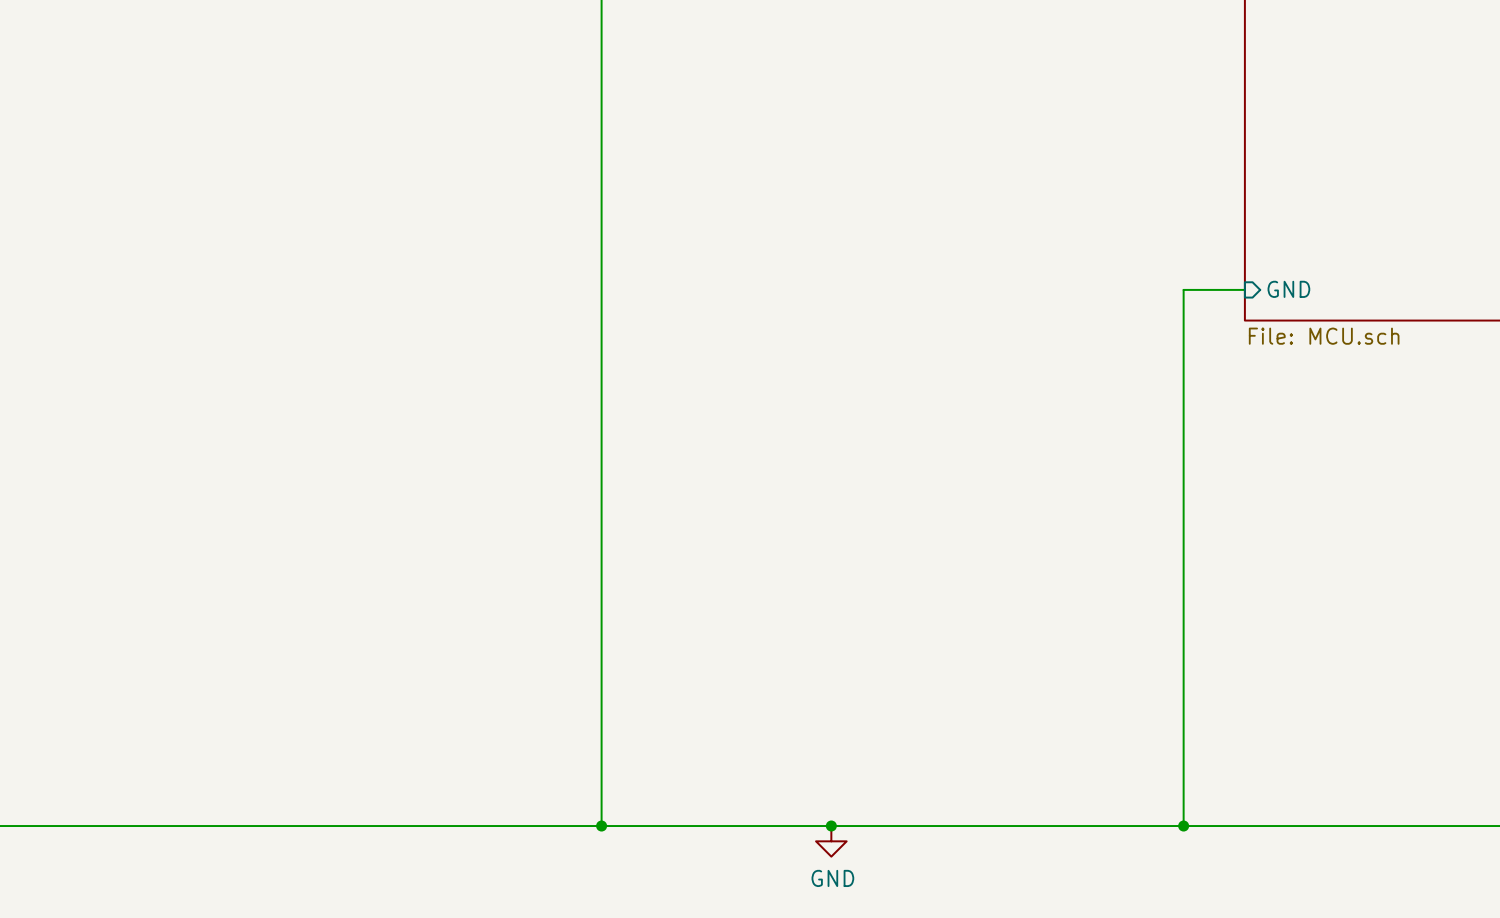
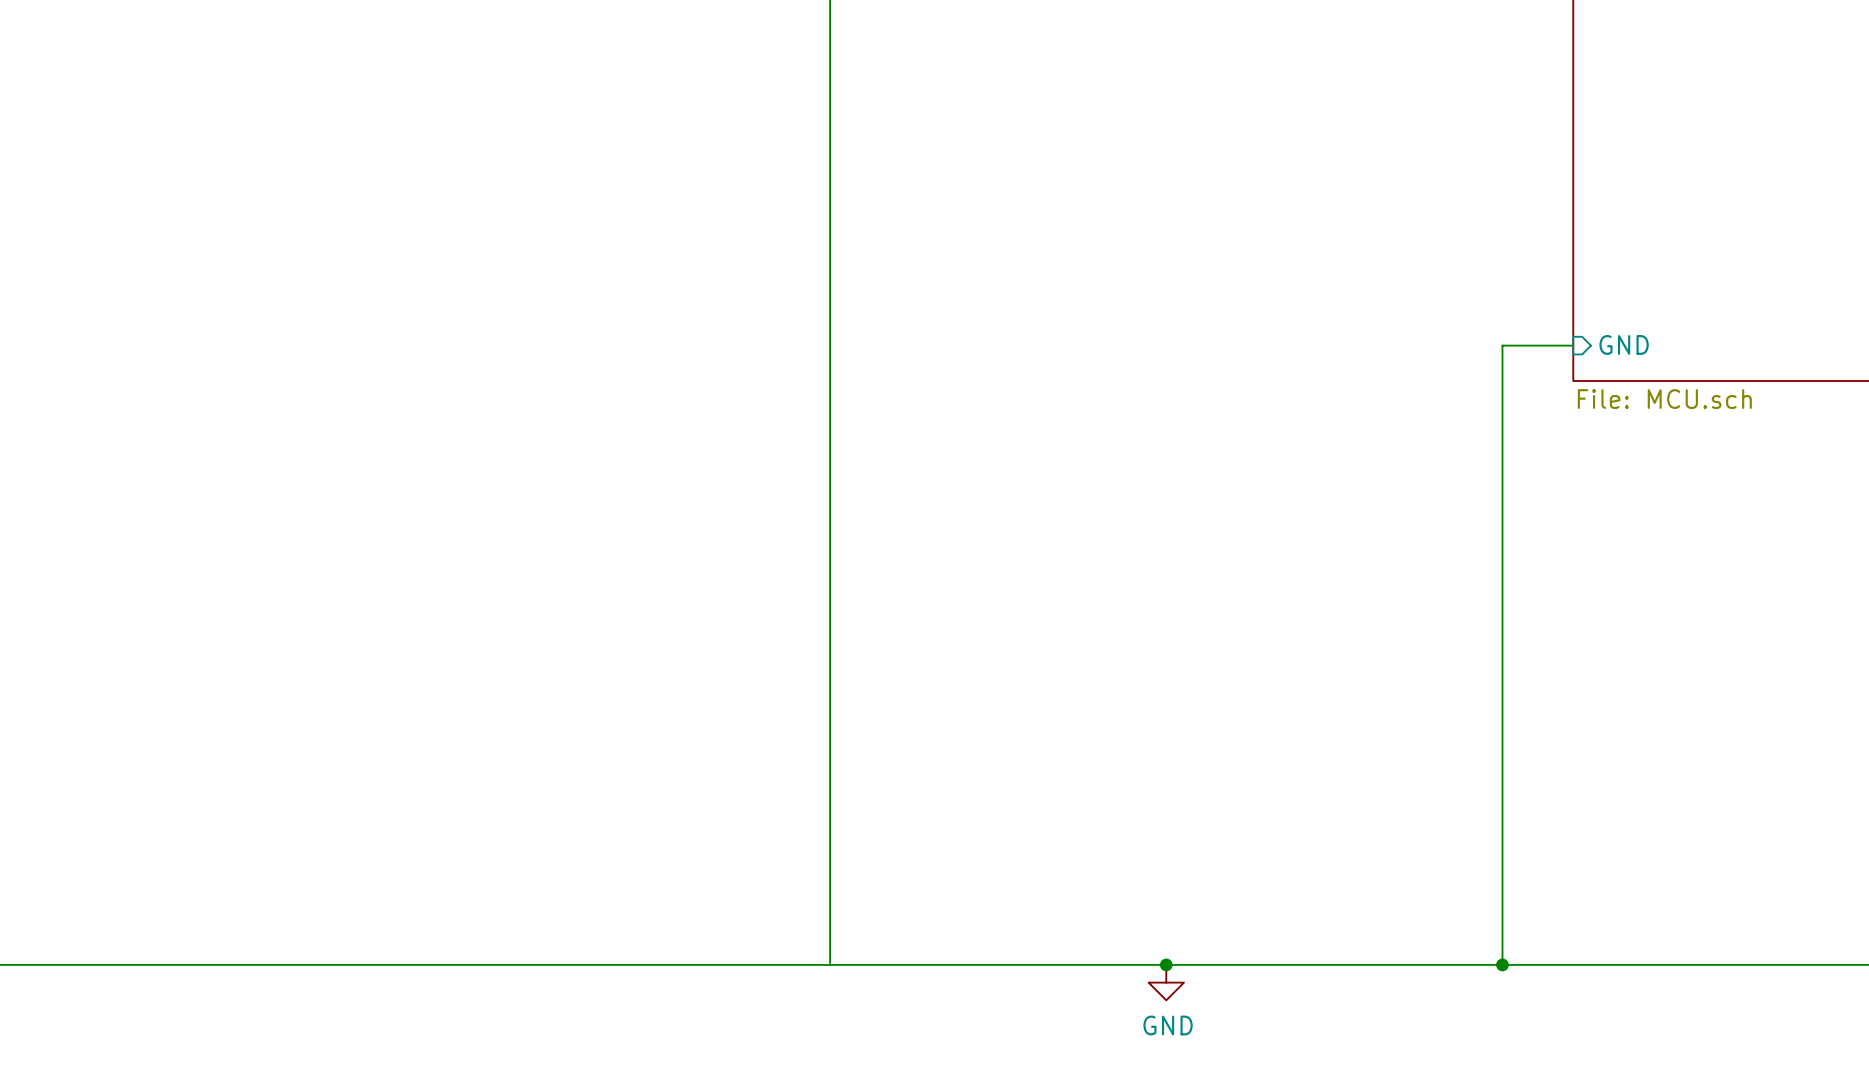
junction: (601, 826) -> none
junction position: (831, 826) -> (1166, 964)
power symbol position: GND (831, 841) -> GND (1166, 982)

